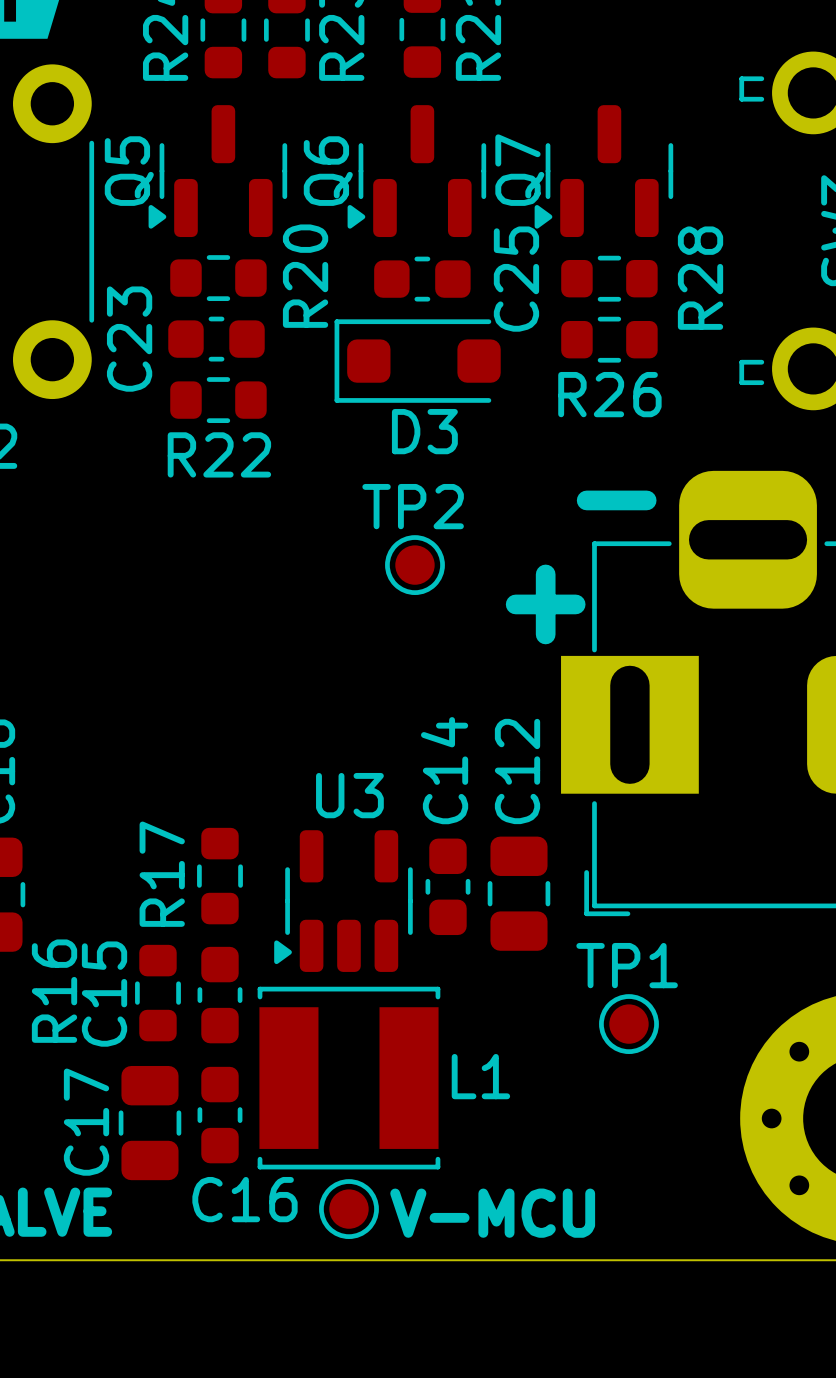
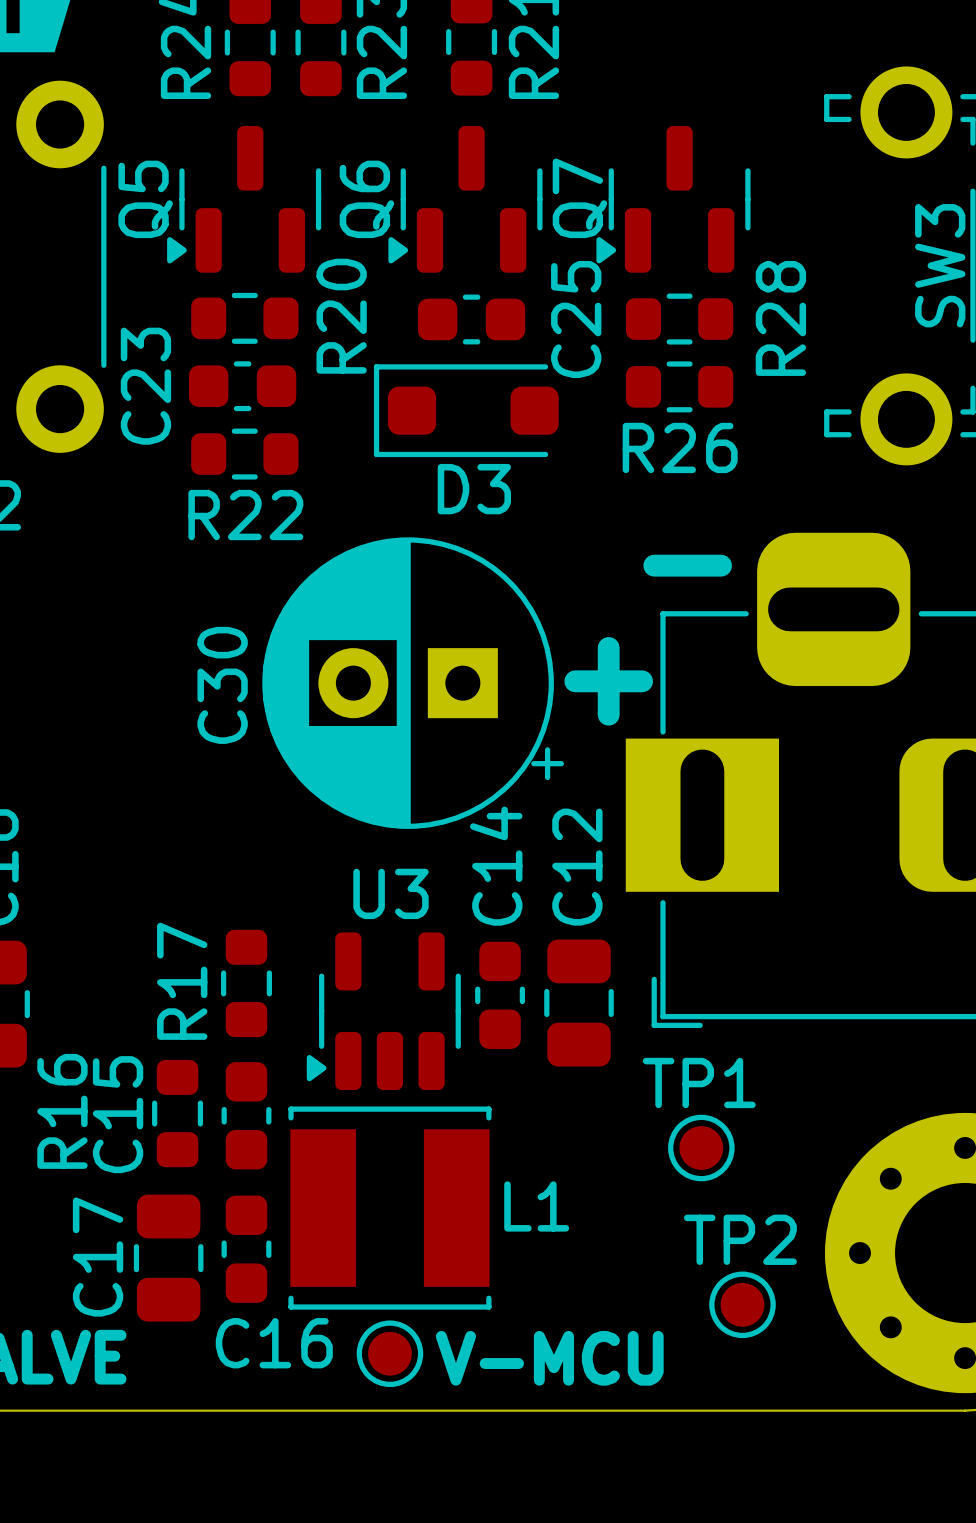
TP2 position: (414, 565) -> (742, 1304)
C30: none -> (413, 683)

